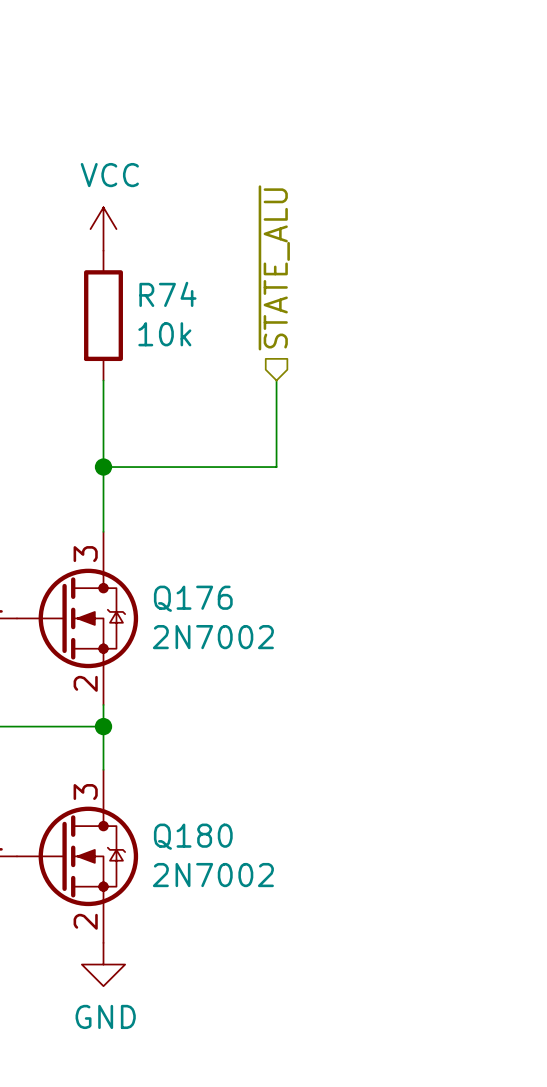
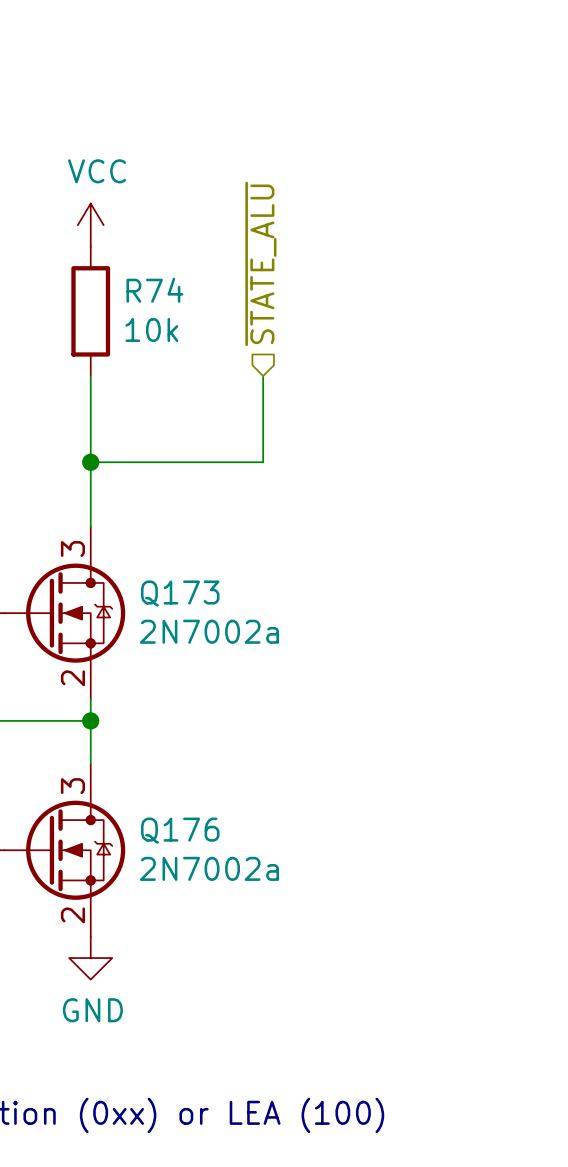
Q176 name: Q176 (193, 598) -> Q173 (180, 593)
Q176 value: 2N7002 (213, 637) -> 2N7002a (209, 631)
Q180 name: Q180 (193, 836) -> Q176 (180, 830)
Q180 value: 2N7002 (213, 875) -> 2N7002a (209, 868)

